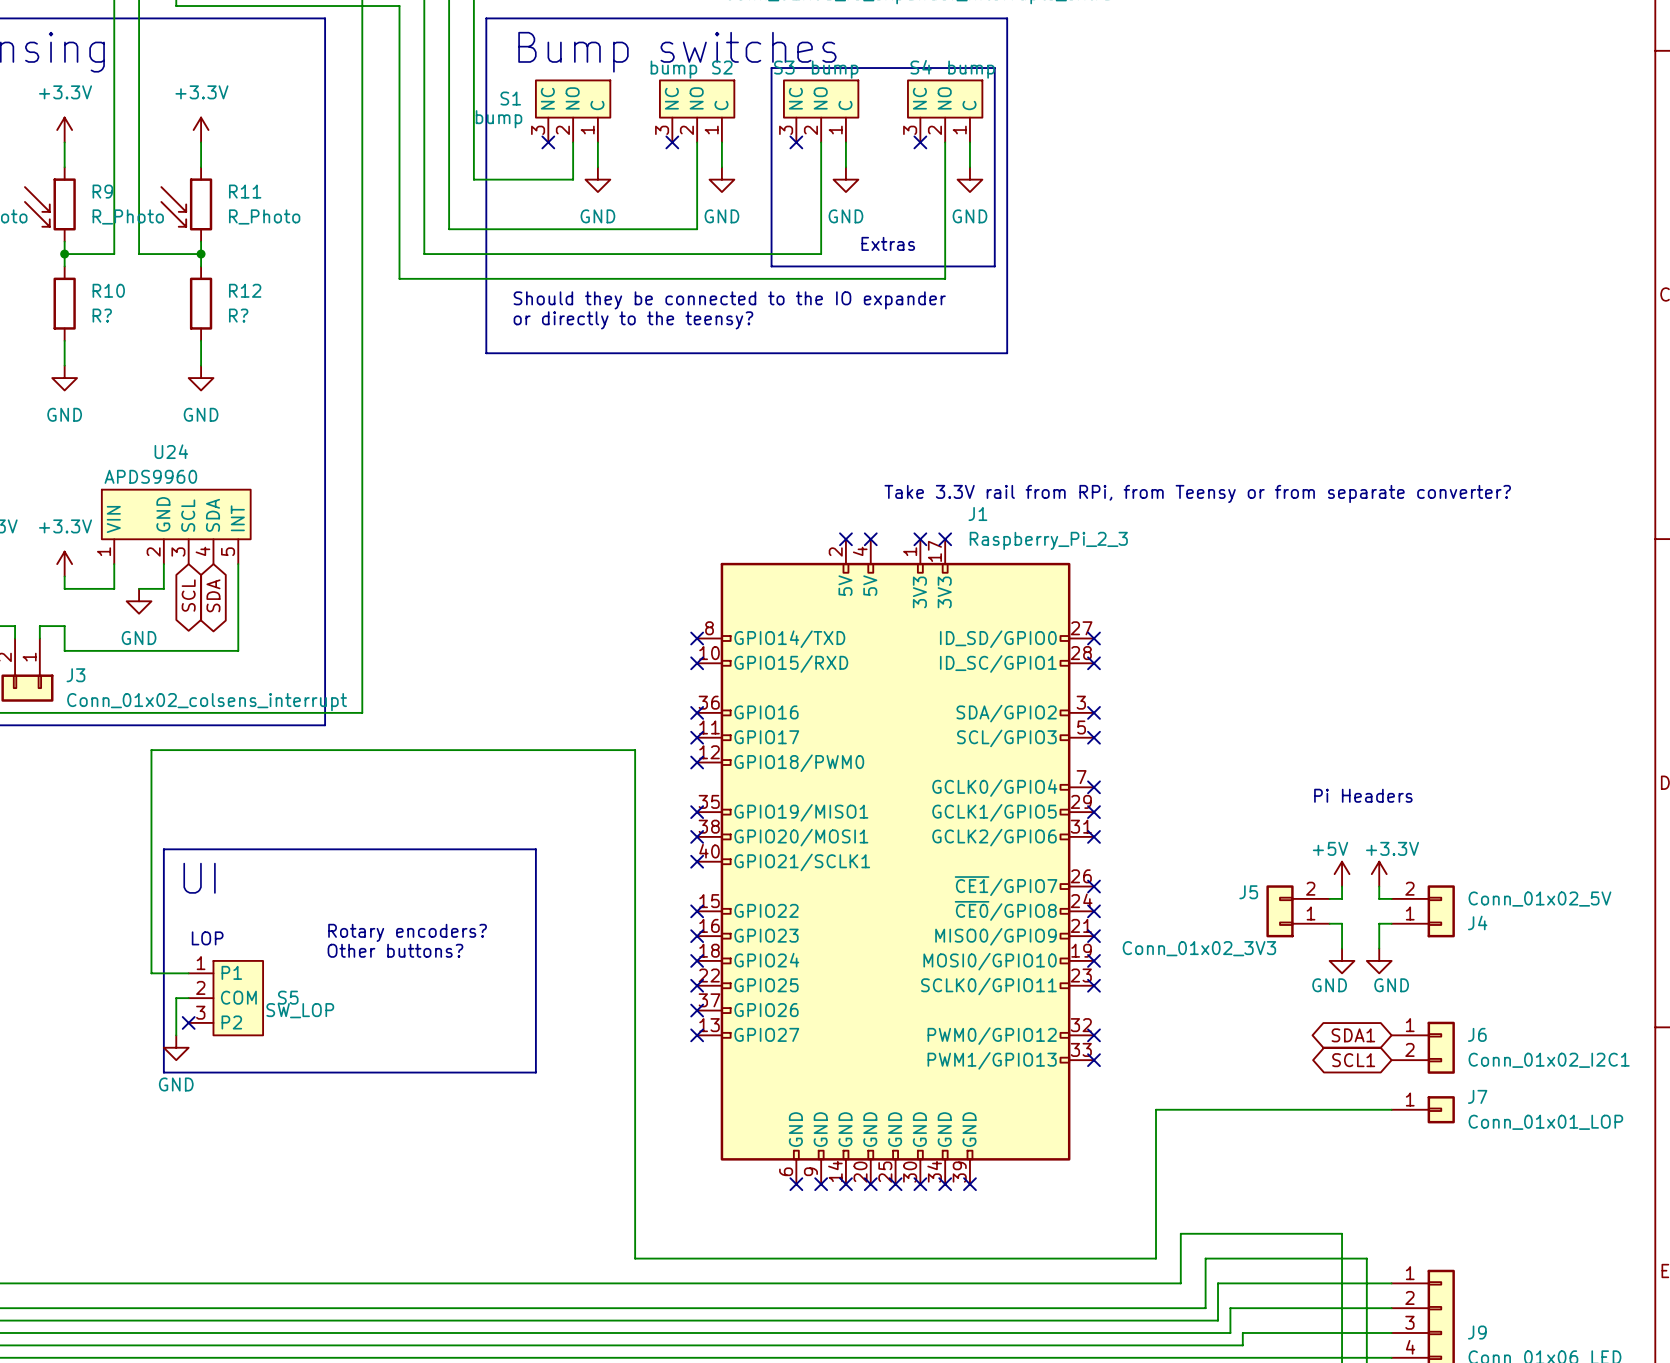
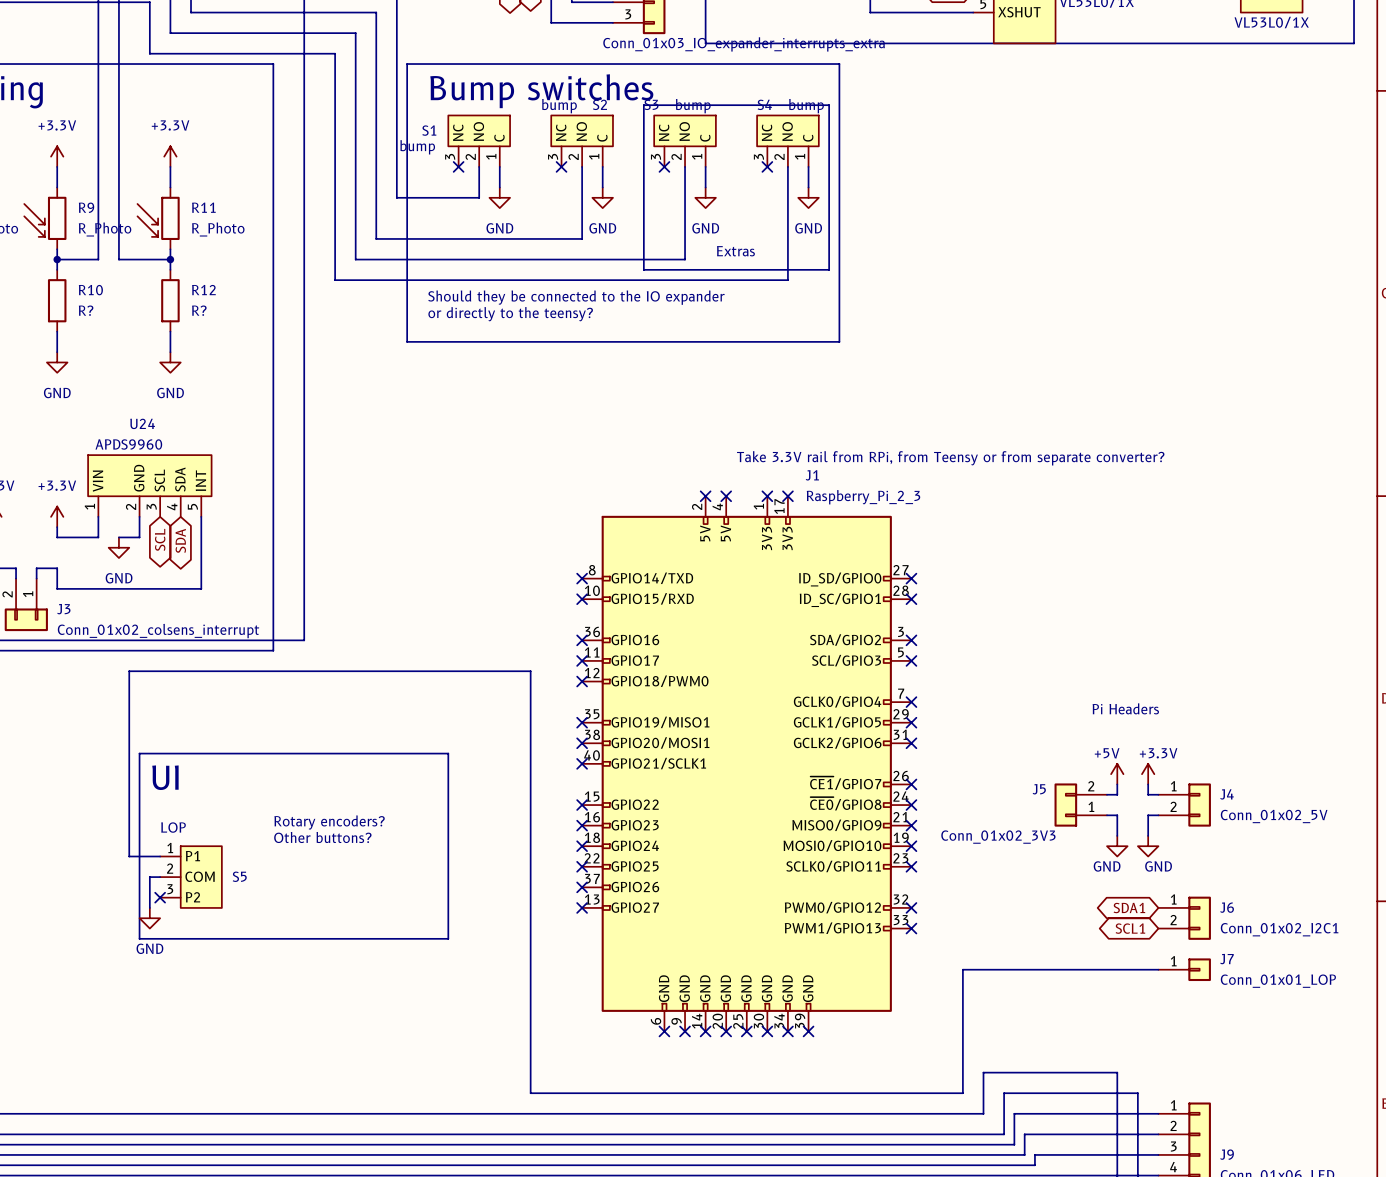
J4 flip: as is (1441, 911) -> up-down (1199, 805)
S5 value: SW_LOP (300, 1010) -> none

